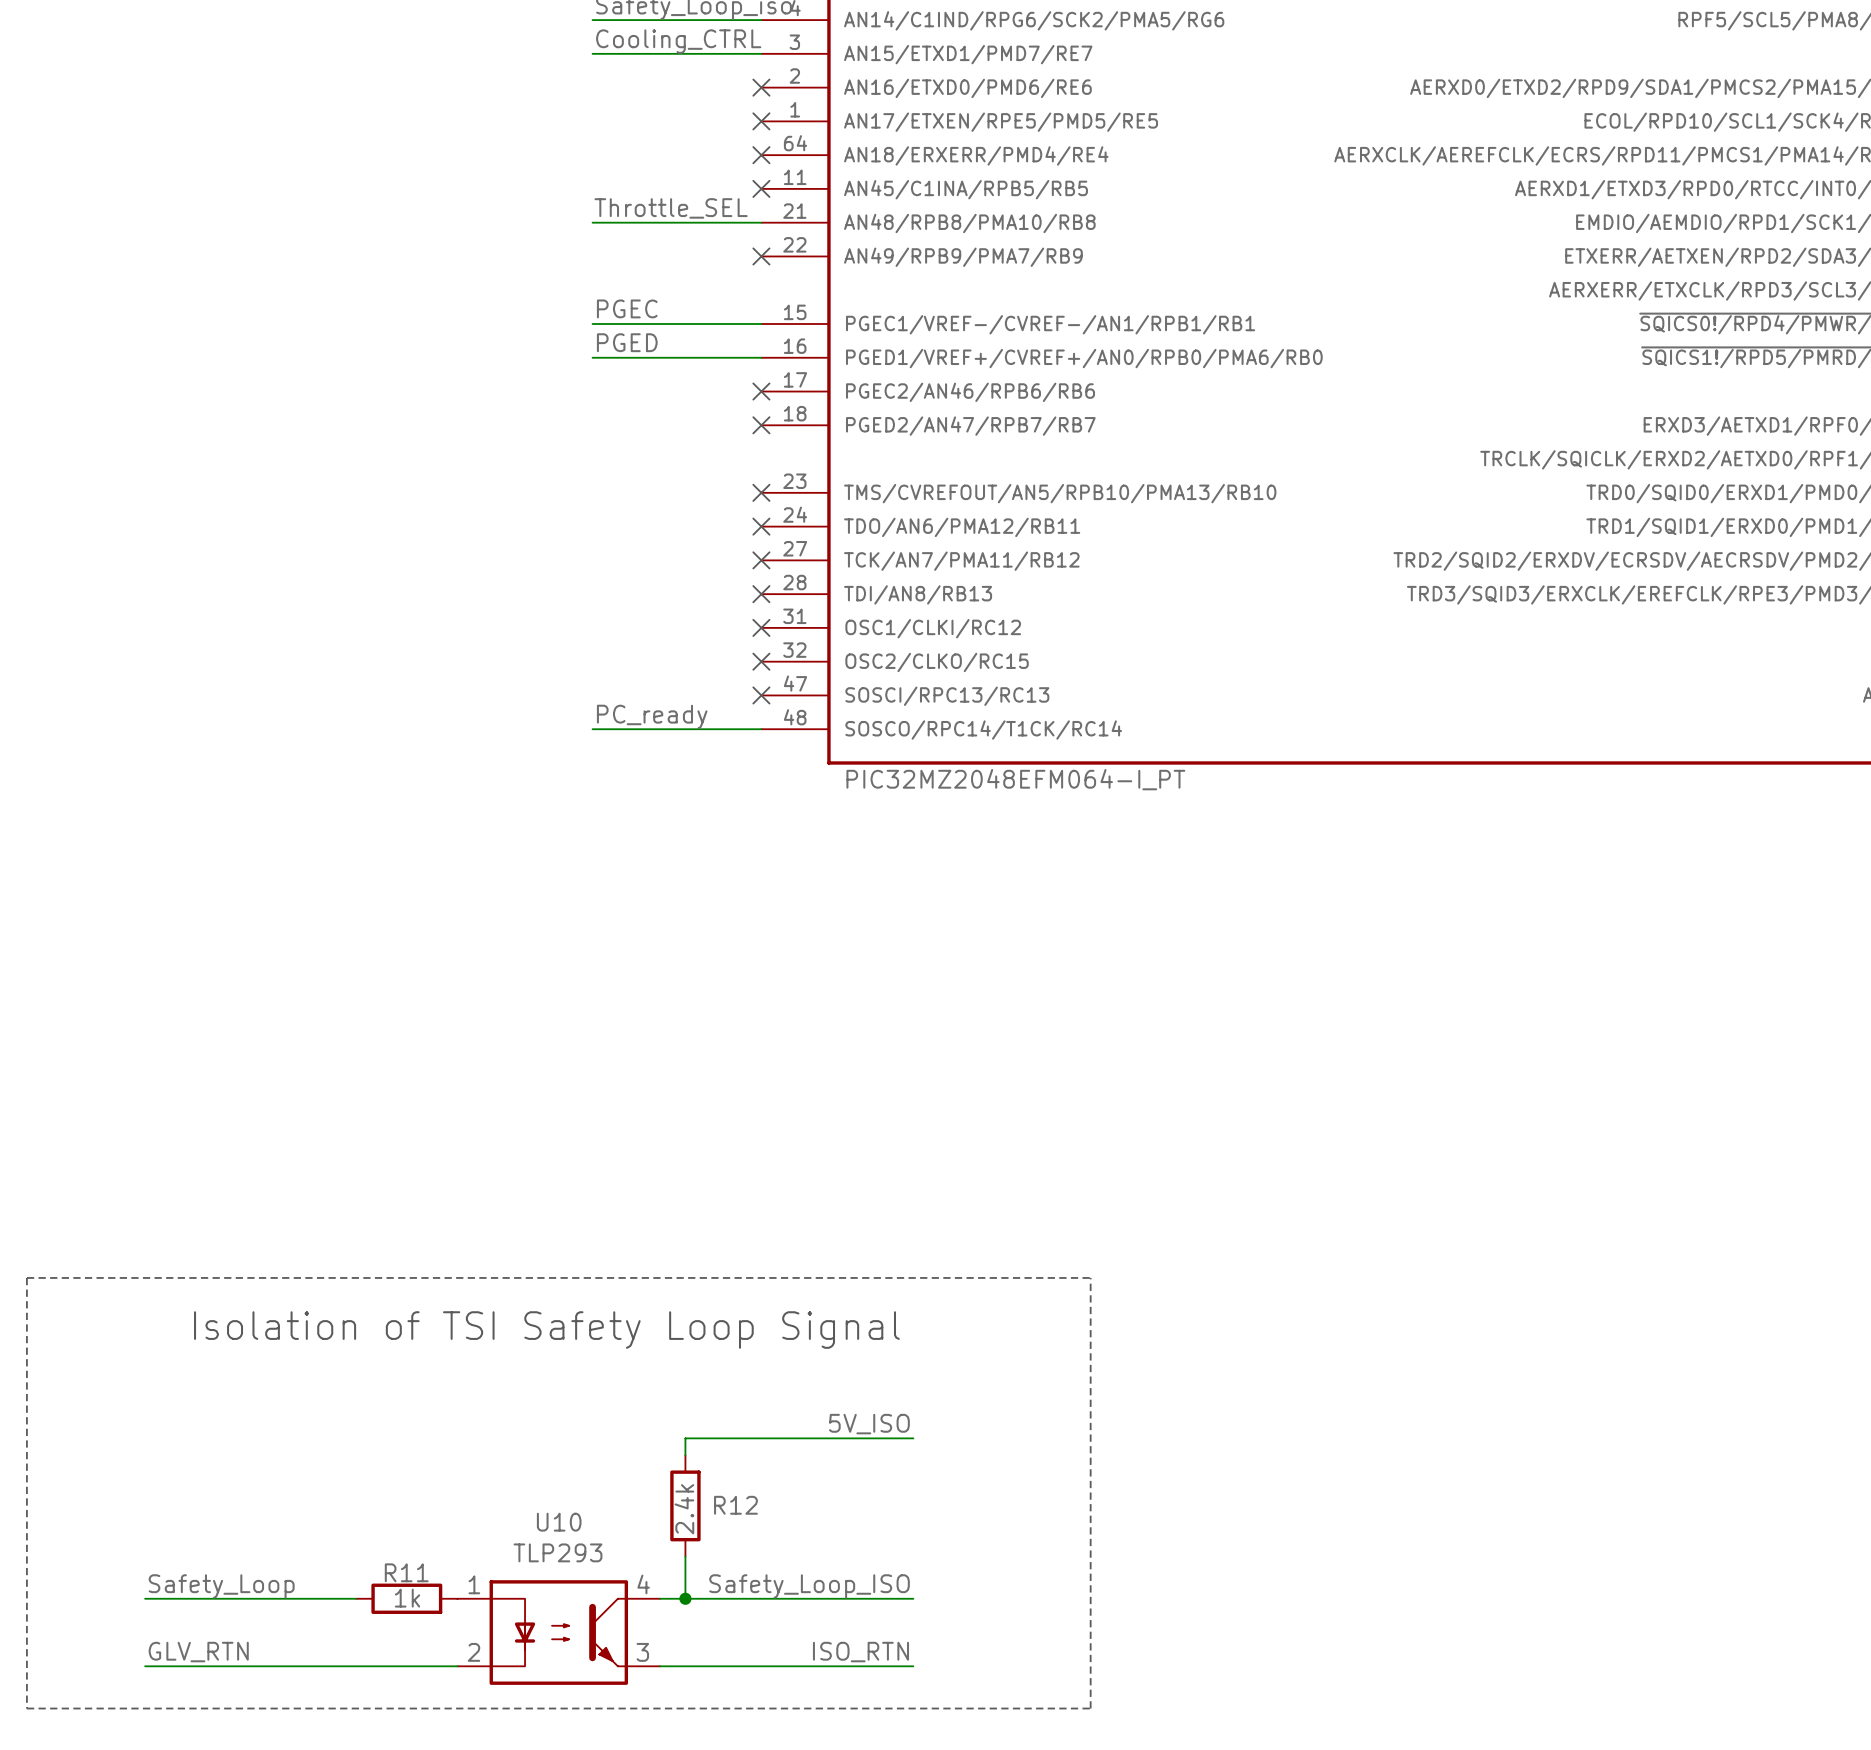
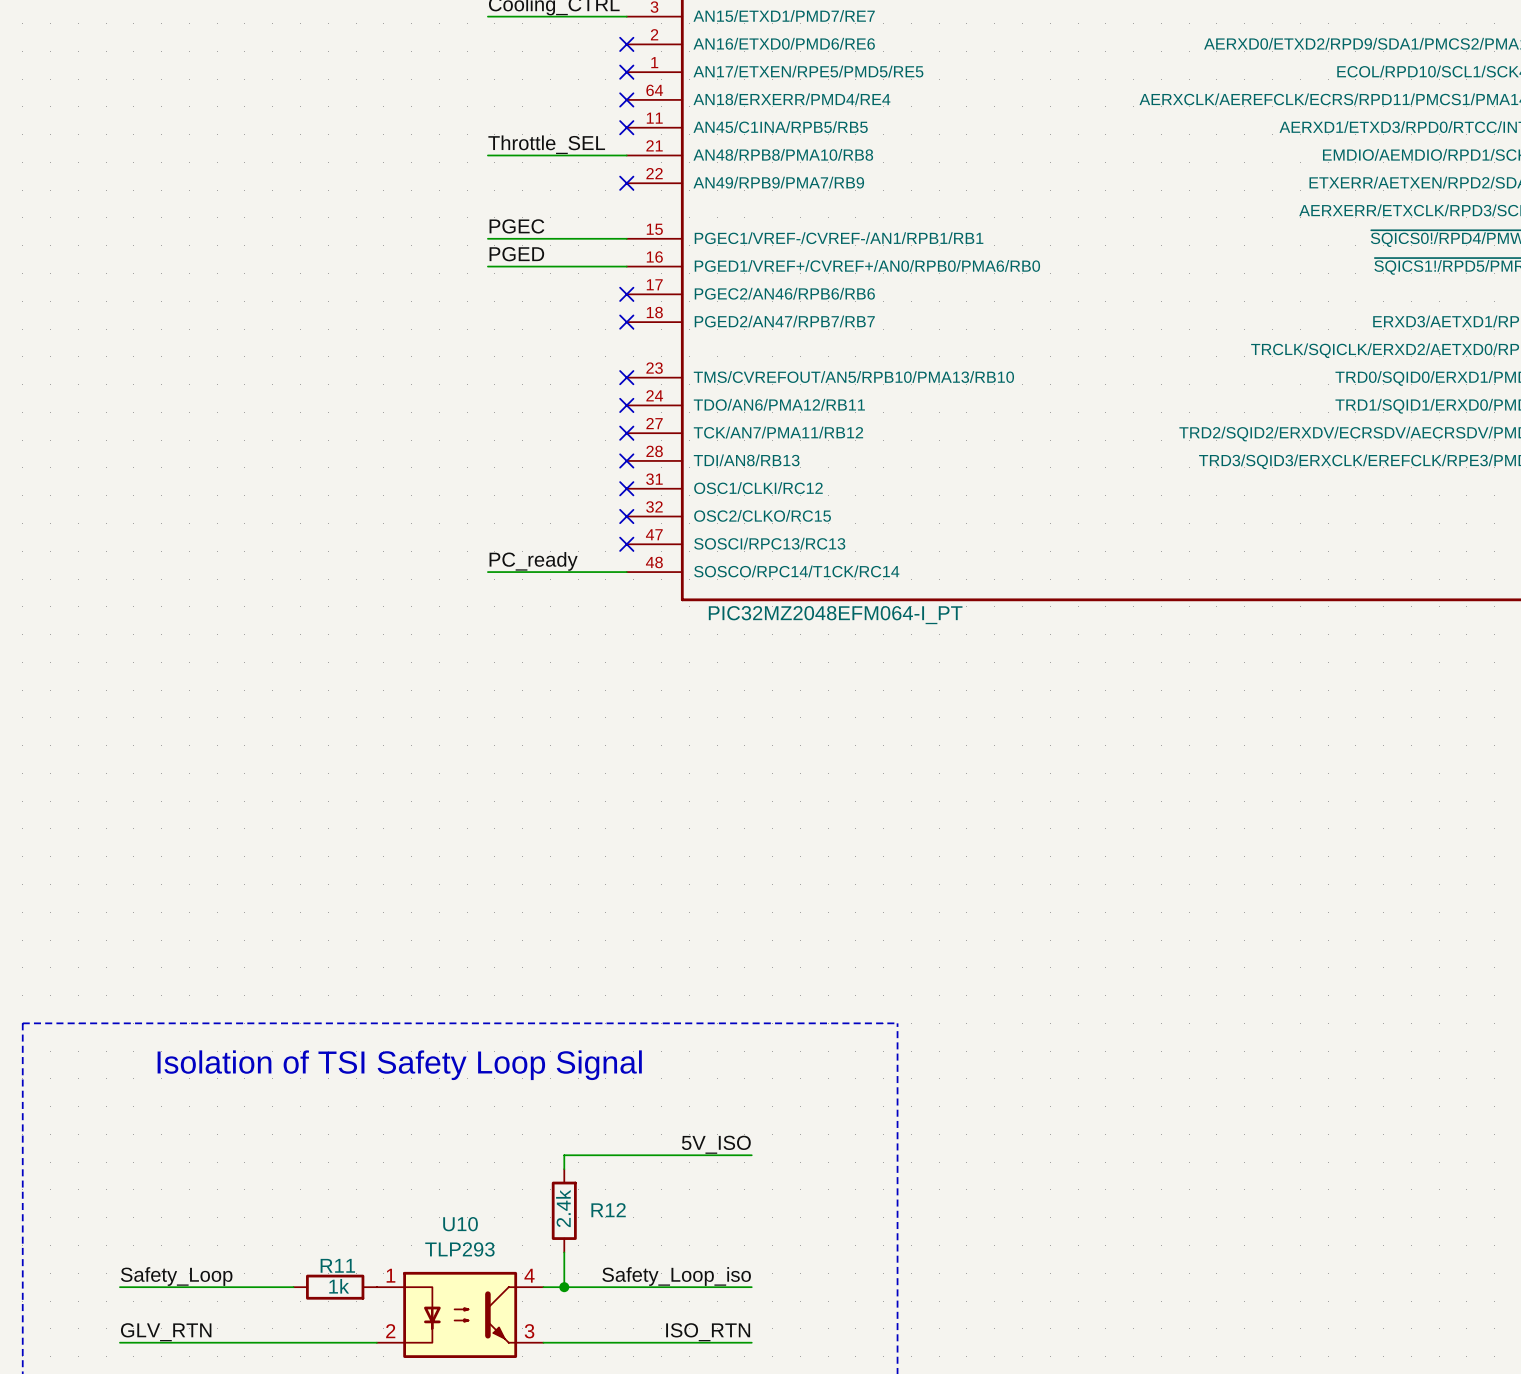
label: Safety_Loop_ISO (809, 1586) -> Safety_Loop_iso (676, 1276)

